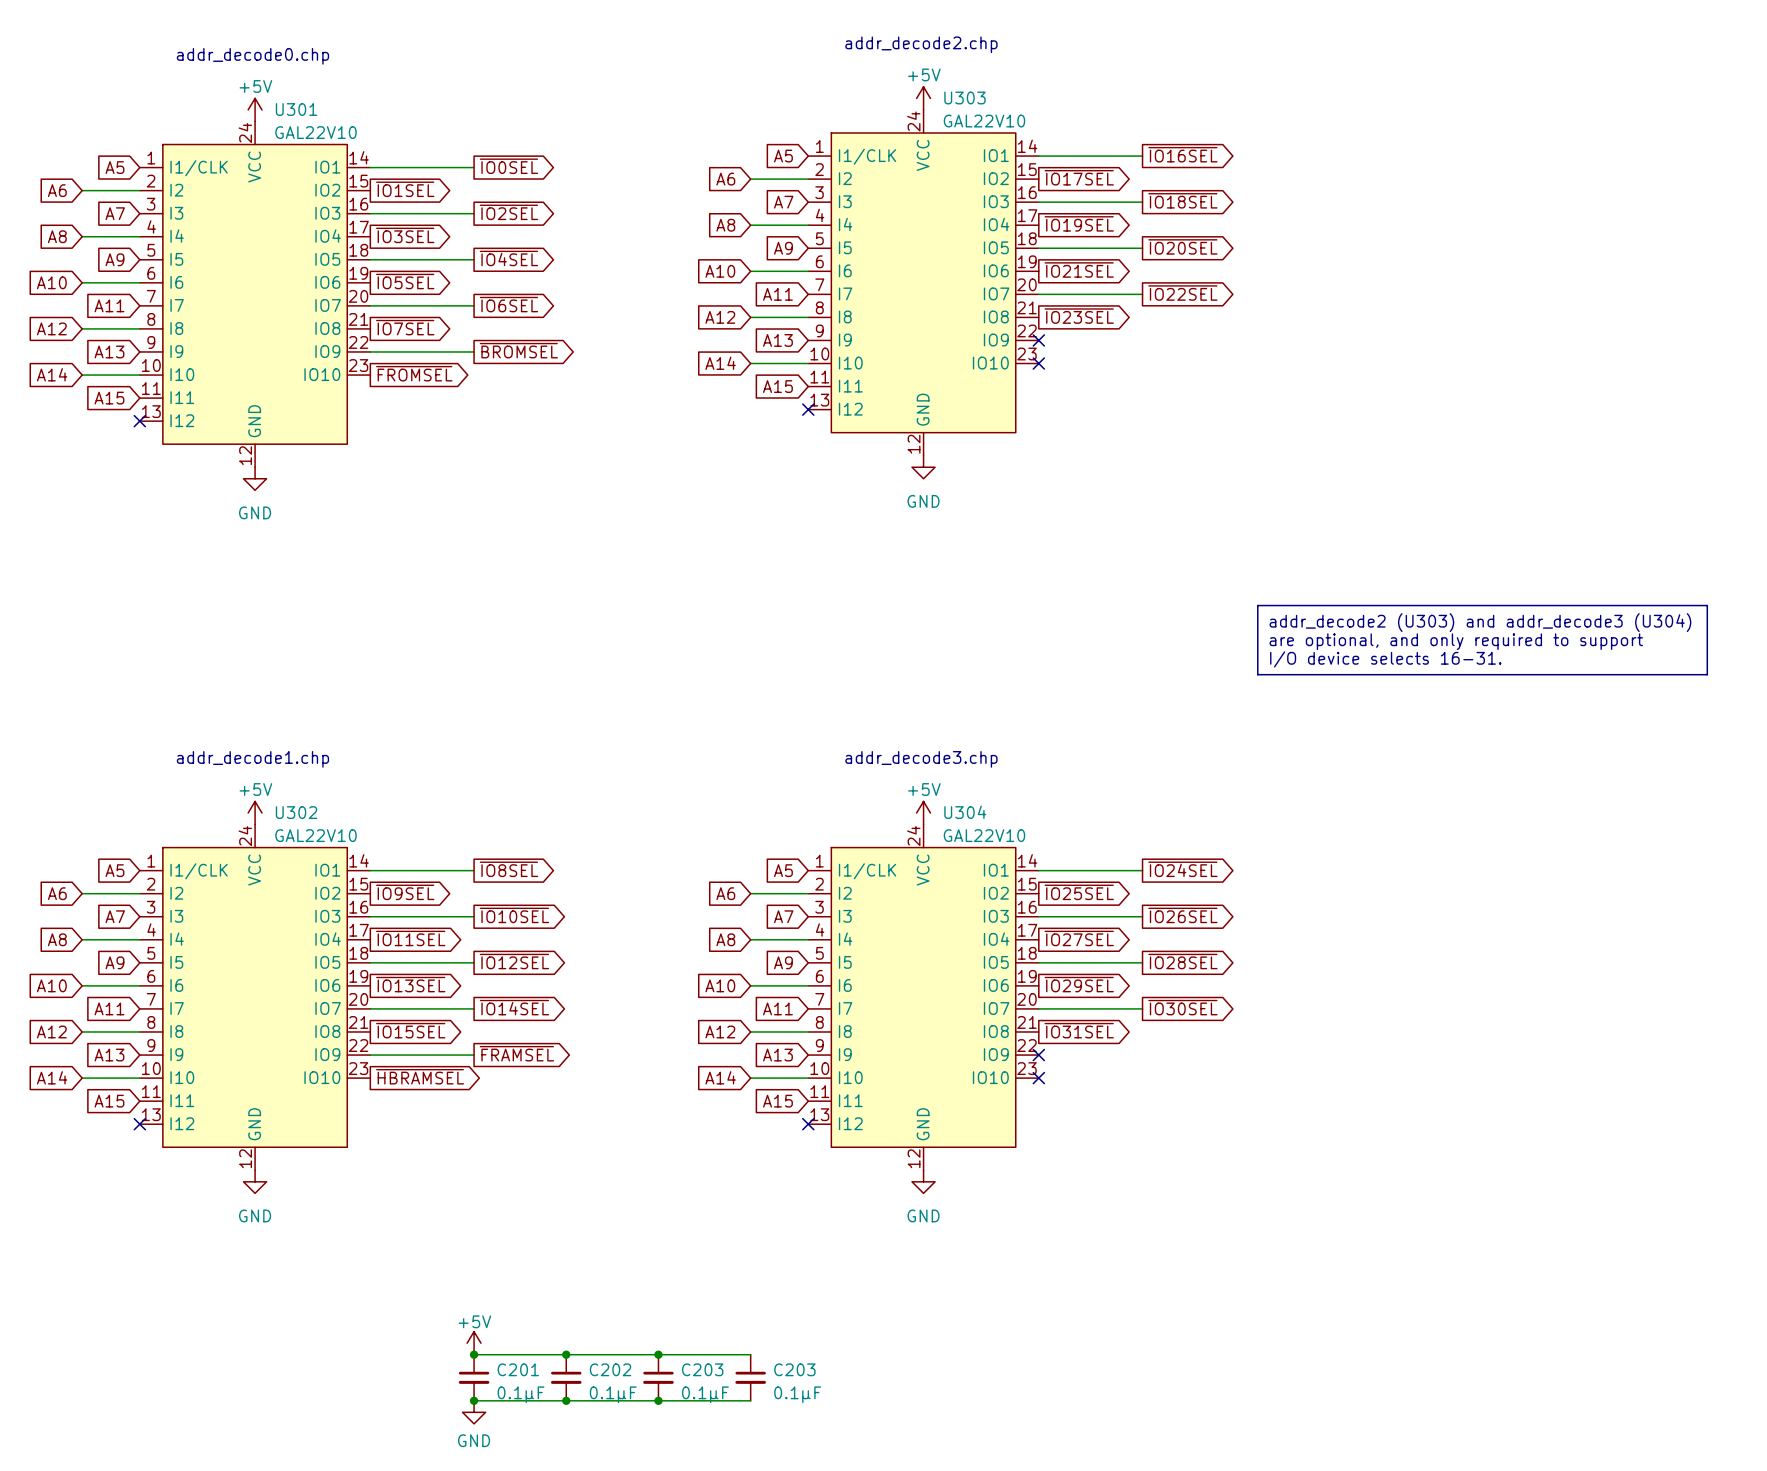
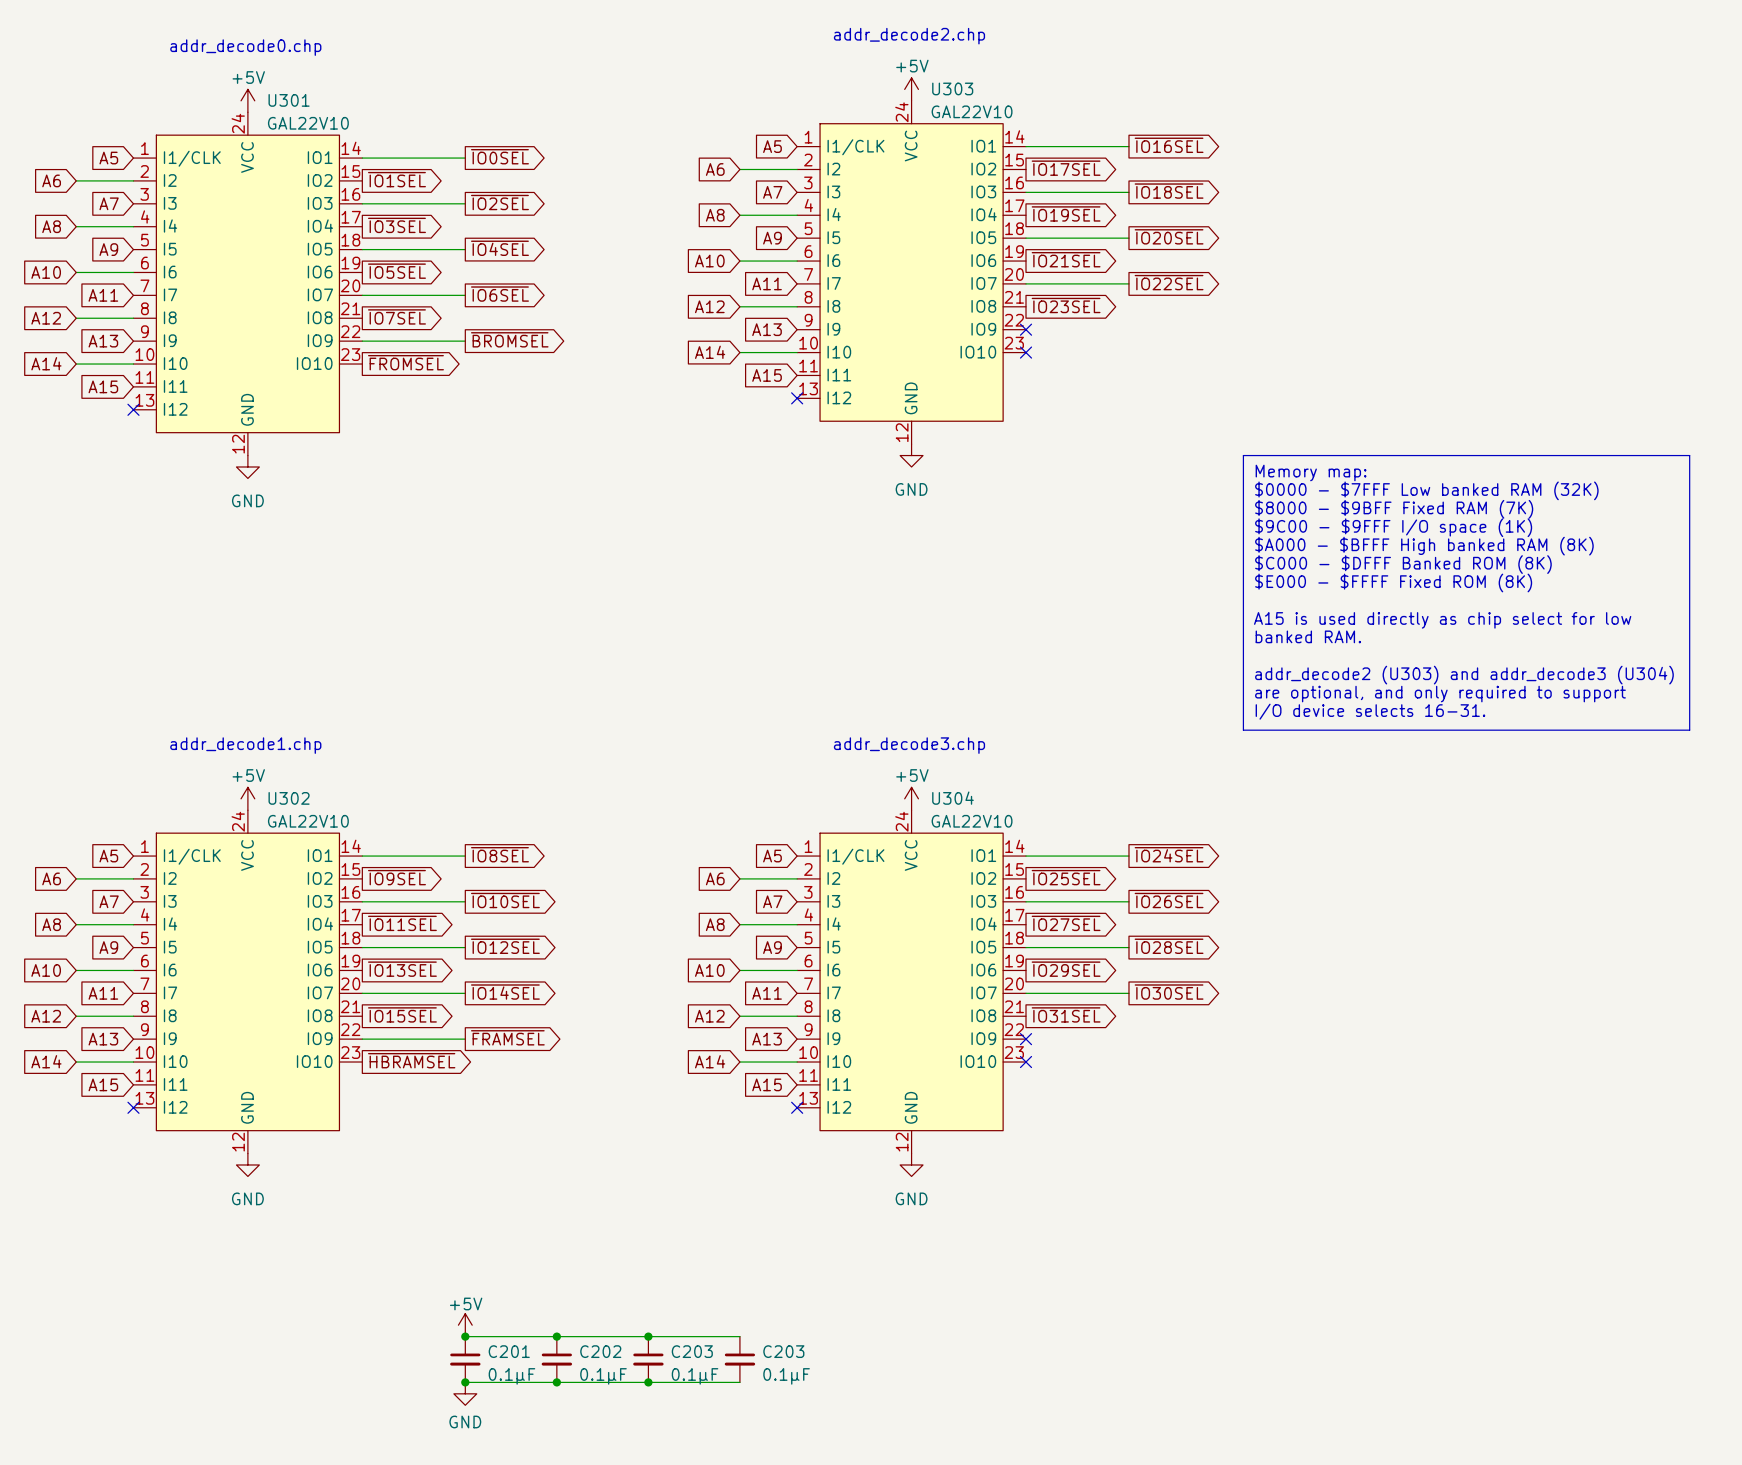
text: none -> Memory map: (1311, 472)
text: none -> $0000 - $7FFF Low banked RAM (32K) (1426, 490)
text: none -> $8000 - $9BFF Fixed RAM (7K) (1394, 509)
text: none -> $9C00 - $9FFF I/O space (1K) (1393, 527)
text: none -> $A000 - $BFFF High banked RAM (8K) (1424, 546)
text: none -> $C000 - $DFFF Banked ROM (8K) (1403, 564)
text: none -> $E000 - $FFFF Fixed ROM (8K) (1393, 582)
line: (1257, 605) (1707, 605) -> (1243, 592) (1243, 455) (1689, 455) (1689, 592)
text position: addr_decode2 (U303) and addr_decode3 (U304) (1480, 622) -> addr_decode2 (U303) and addr_decode3 (U304) (1464, 675)
text: none -> A15 is used directly as chip select for low (1442, 620)
text position: are optional, and only required to support (1456, 641) -> are optional, and only required to support (1440, 694)
text: none -> banked RAM. (1308, 636)
text position: I/O device selects 16-31. (1385, 659) -> I/O device selects 16-31. (1370, 711)
line: (1257, 674) (1707, 674) -> (1243, 661) (1243, 730) (1689, 730) (1689, 661)

